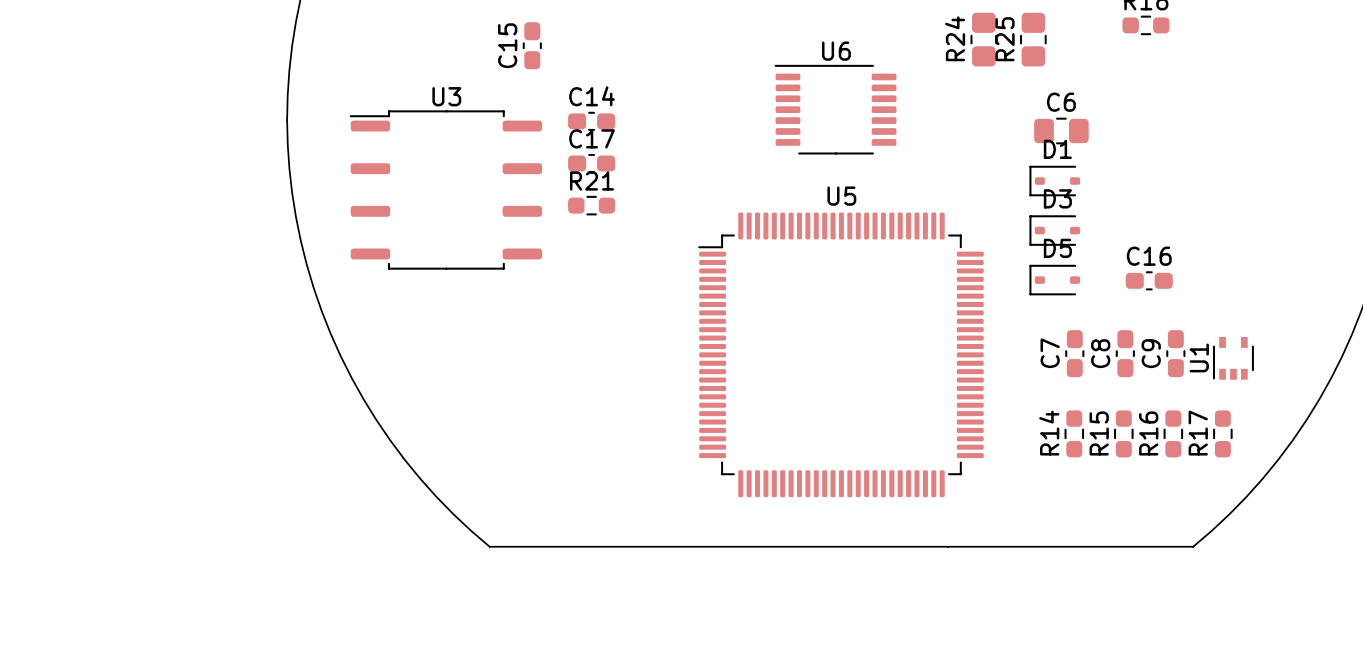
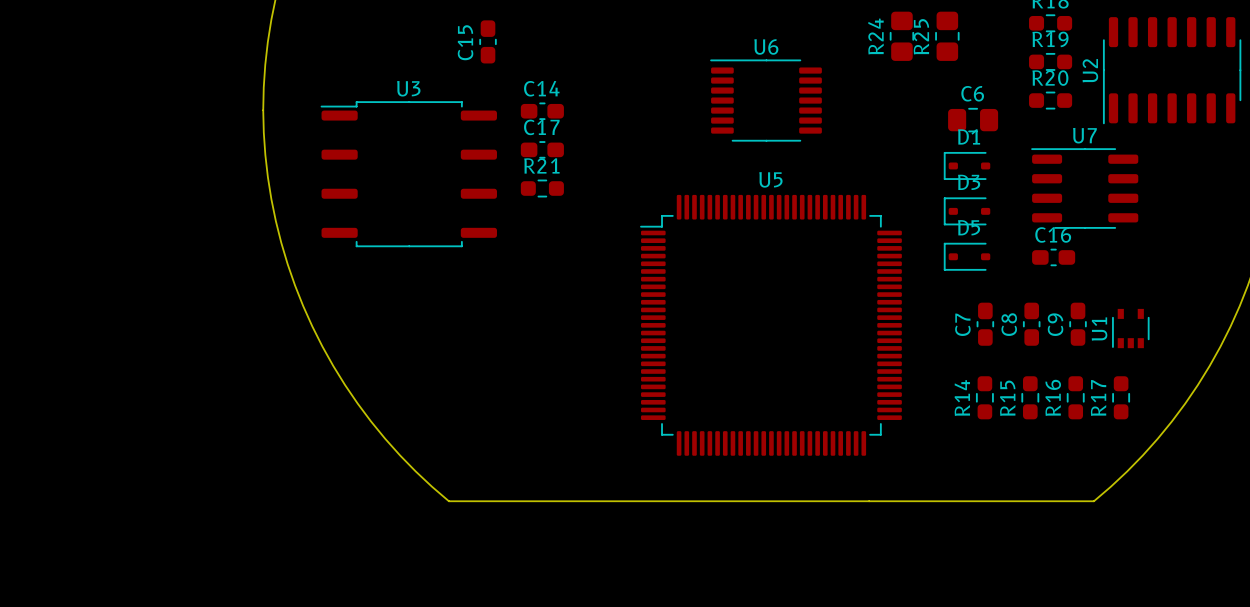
R19: none -> (1050, 61)
U2: none -> (1172, 70)
R20: none -> (1050, 100)
U7: none -> (1084, 188)

